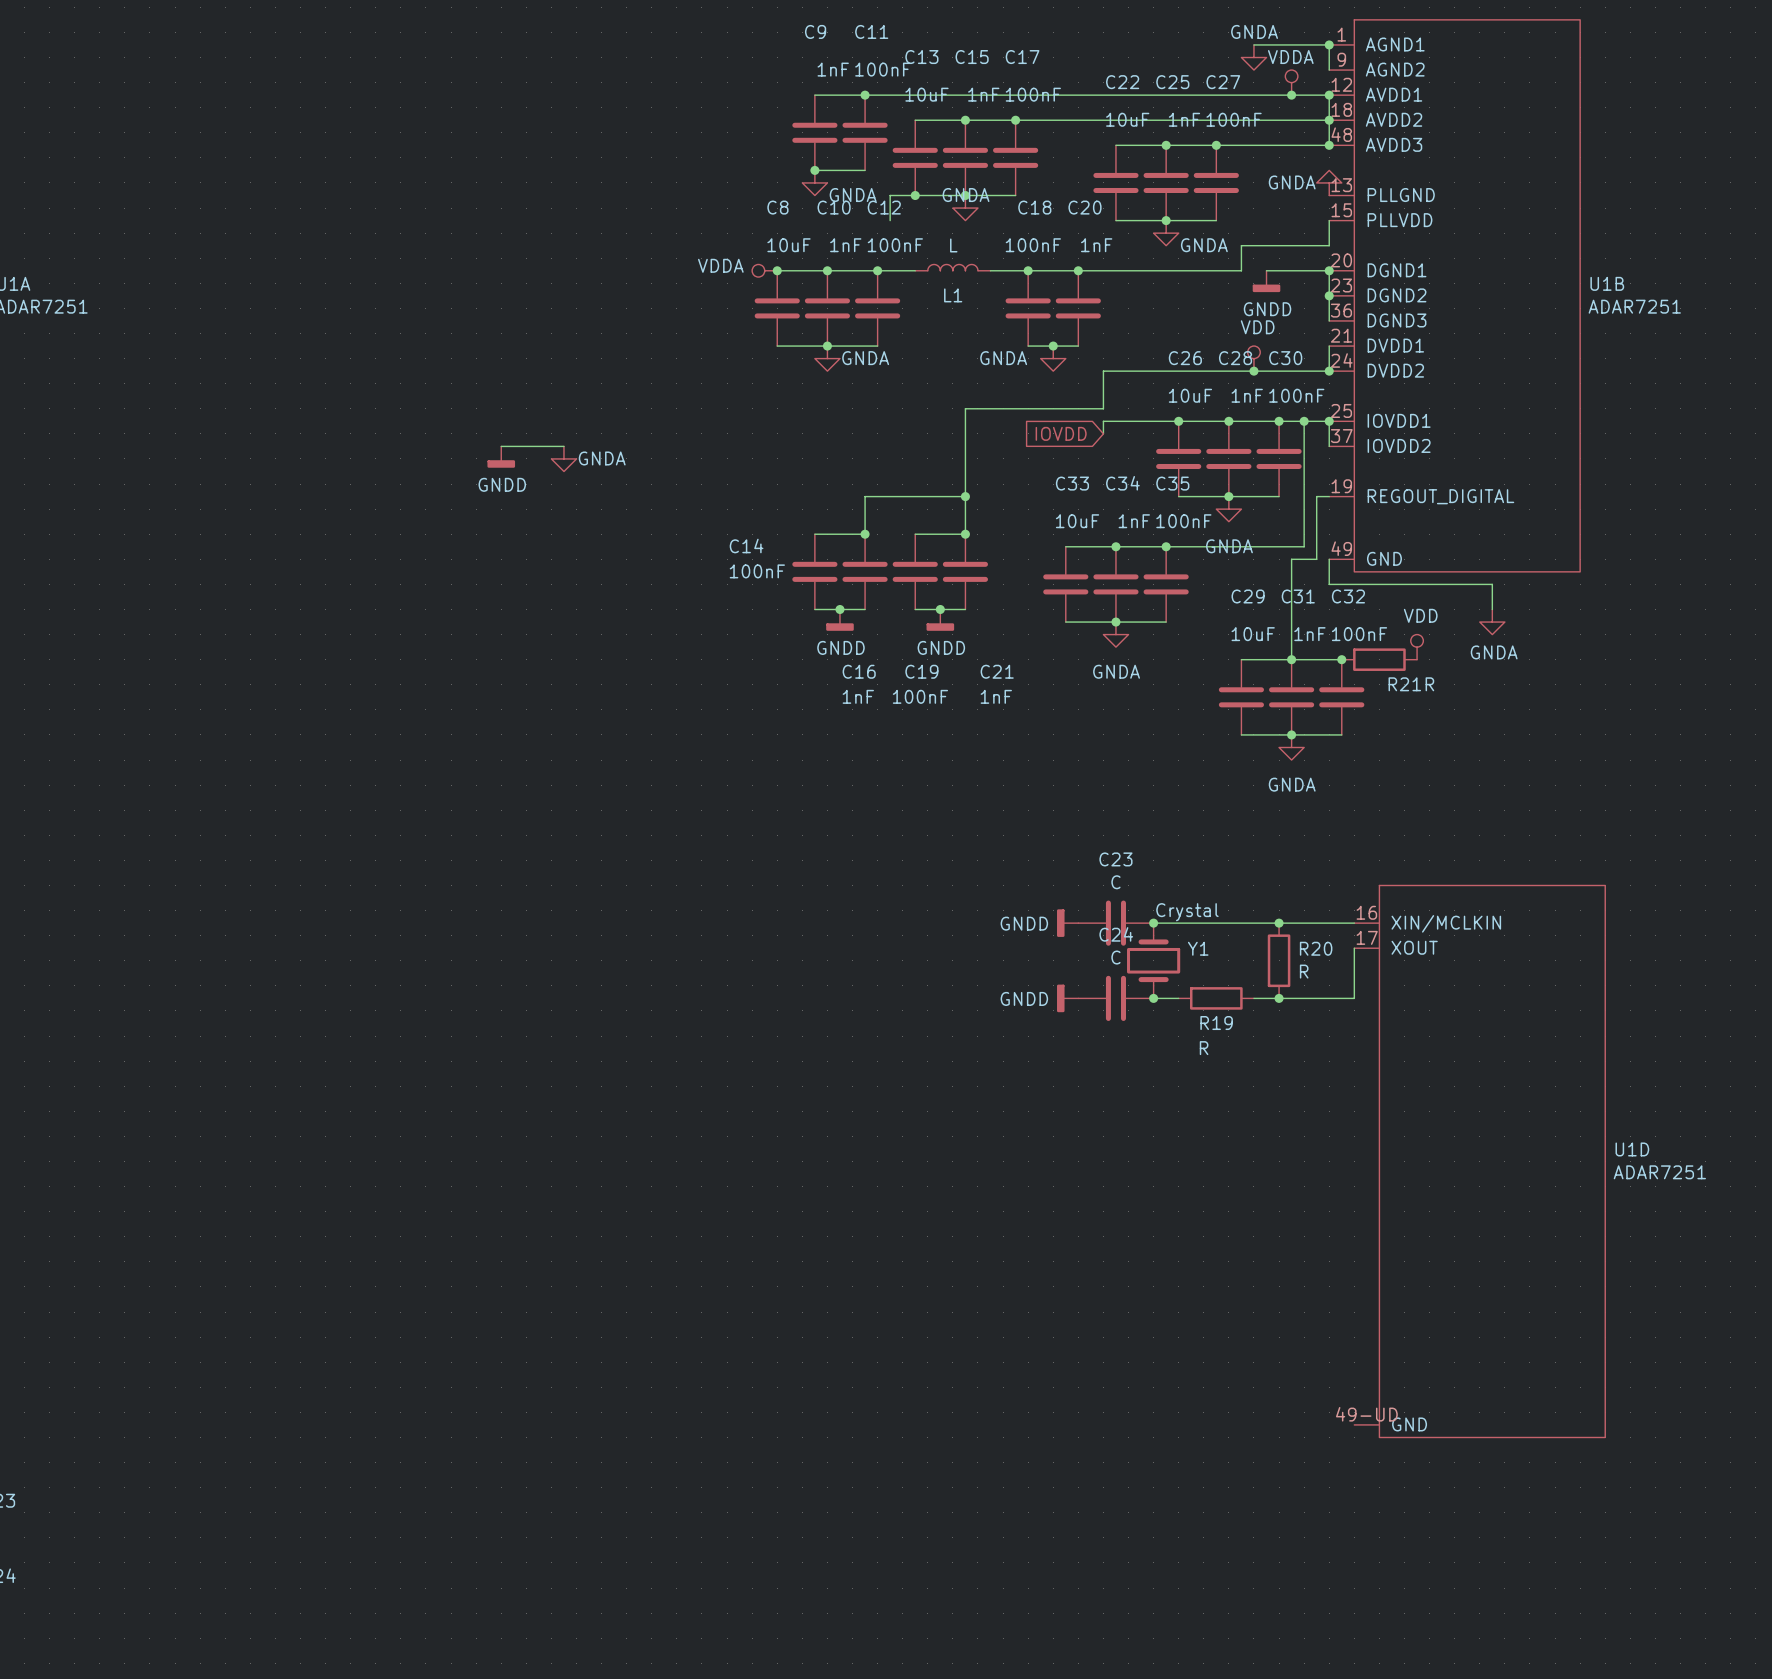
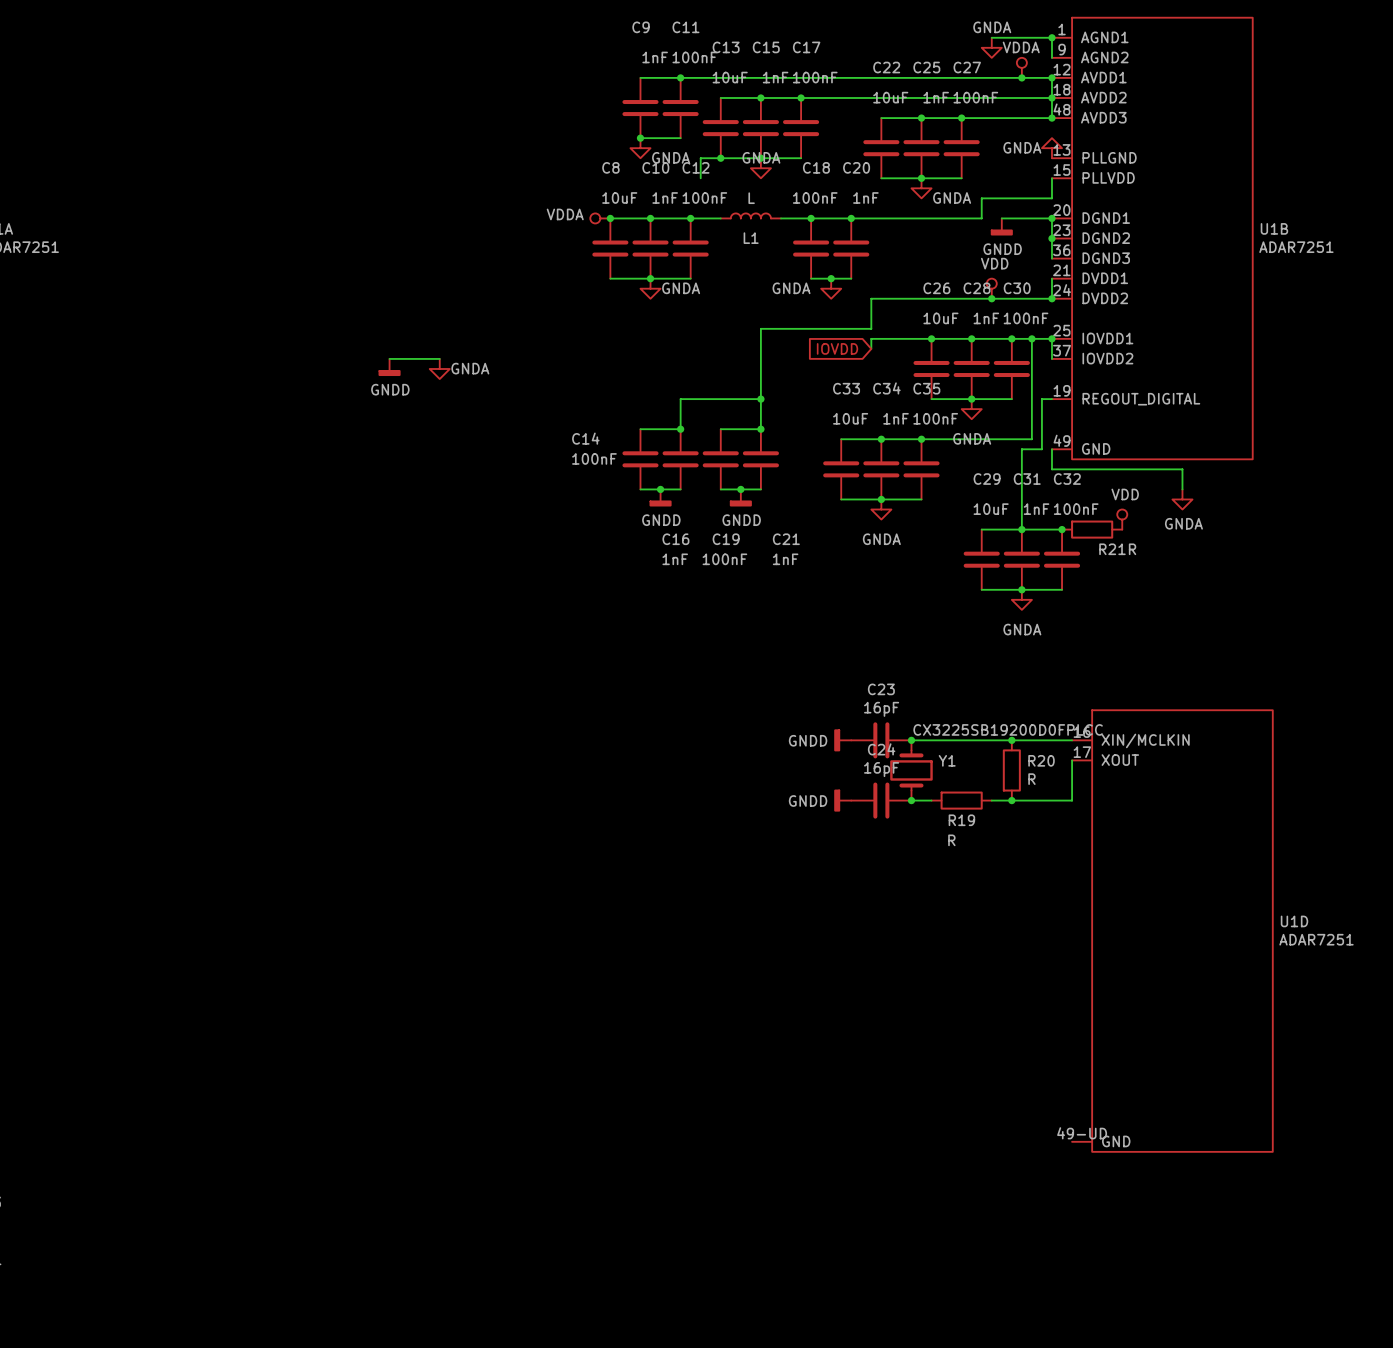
C23 value: C (1115, 882) -> 16pF (881, 709)
Y1 value: Crystal (1187, 912) -> CX3225SB19200D0FPLCC (1008, 729)
C24 value: C (1115, 957) -> 16pF (881, 769)

